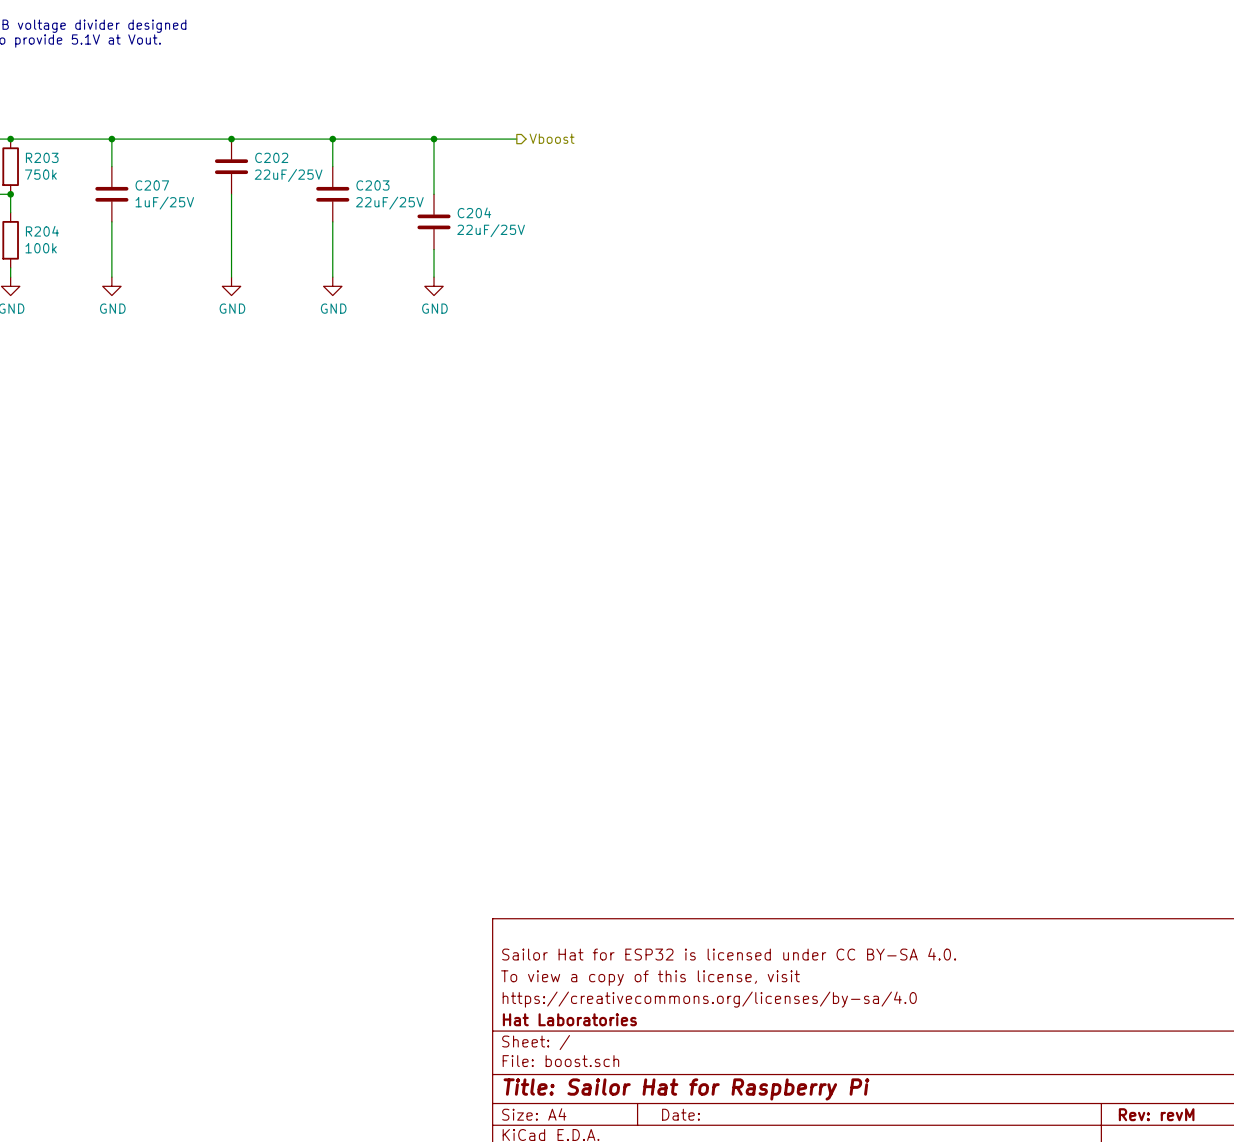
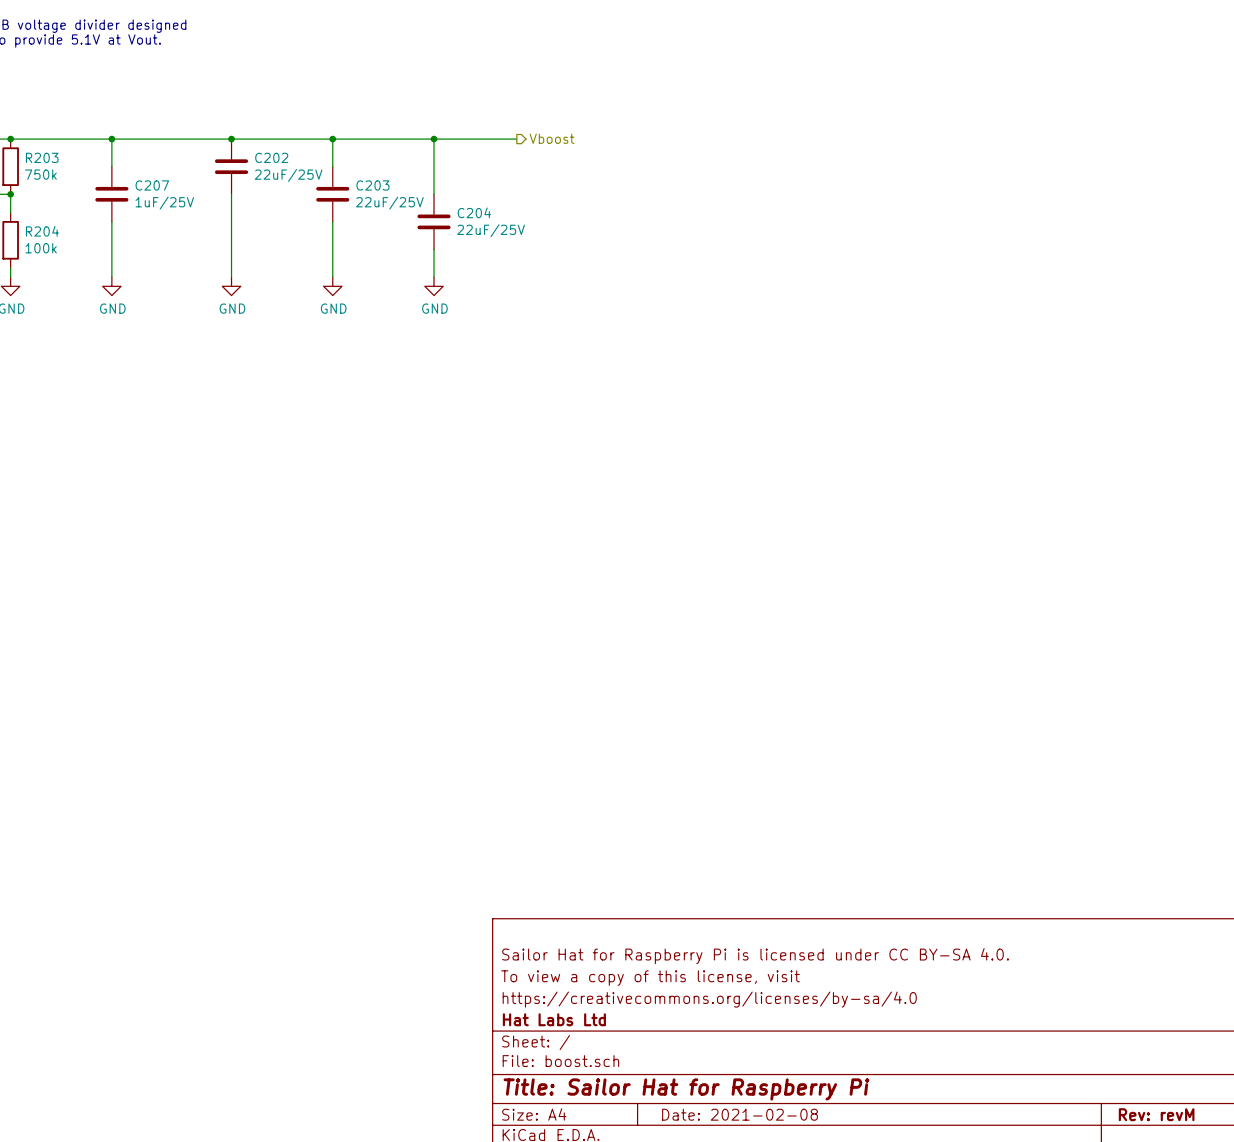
title block: Sailor Hat for ESP32 is licensed under CC BY-SA 4.0. (729, 954) -> Sailor Hat for Raspberry Pi is licensed under CC BY-SA 4.0. (755, 956)
title block: Hat Laboratories (569, 1019) -> Hat Labs Ltd (554, 1019)
title block: Date: (681, 1114) -> Date: 2021-02-08 (740, 1114)

